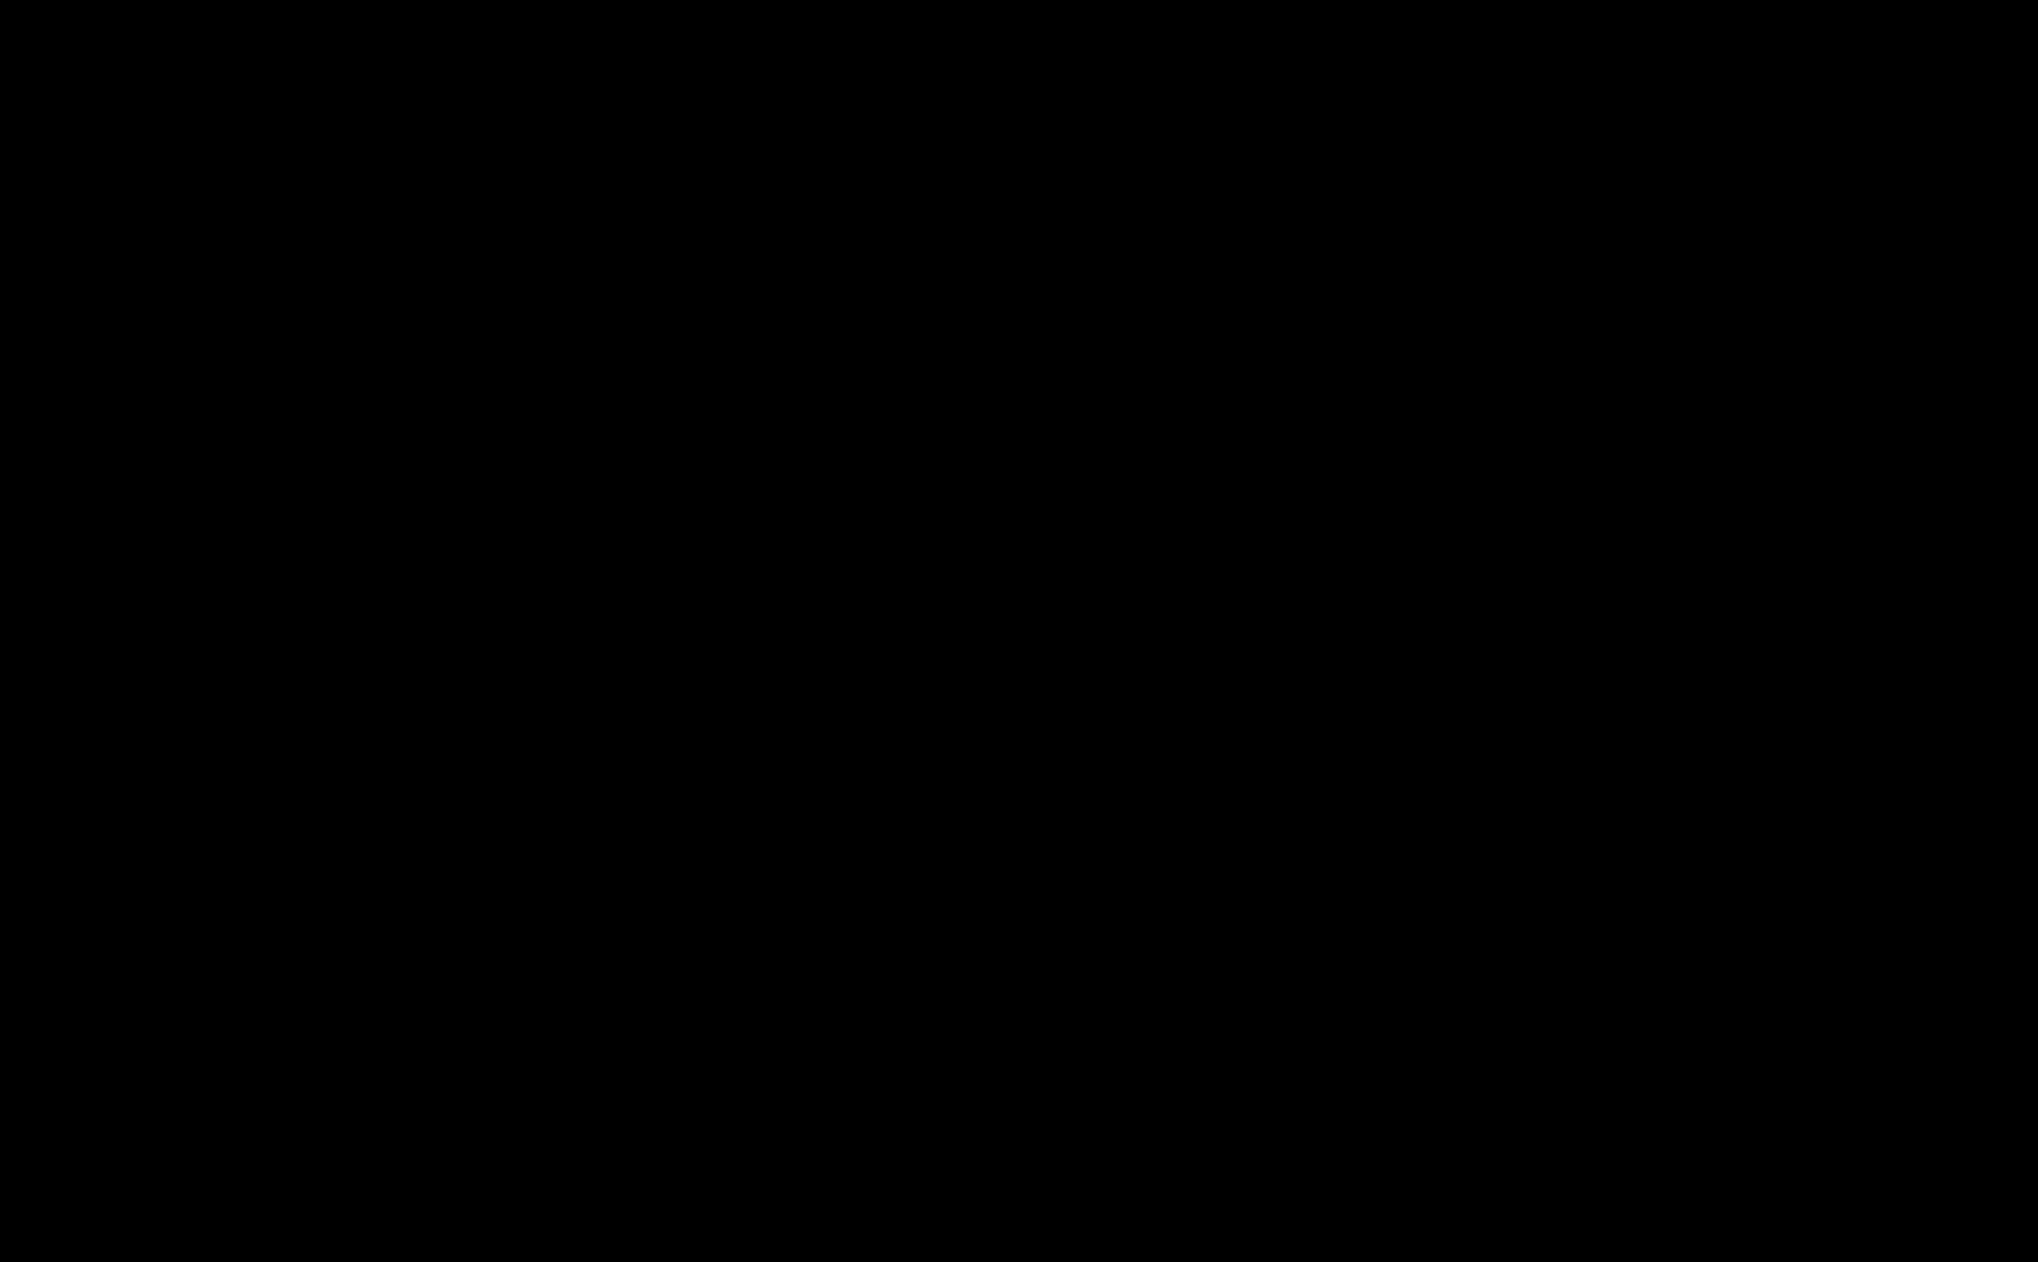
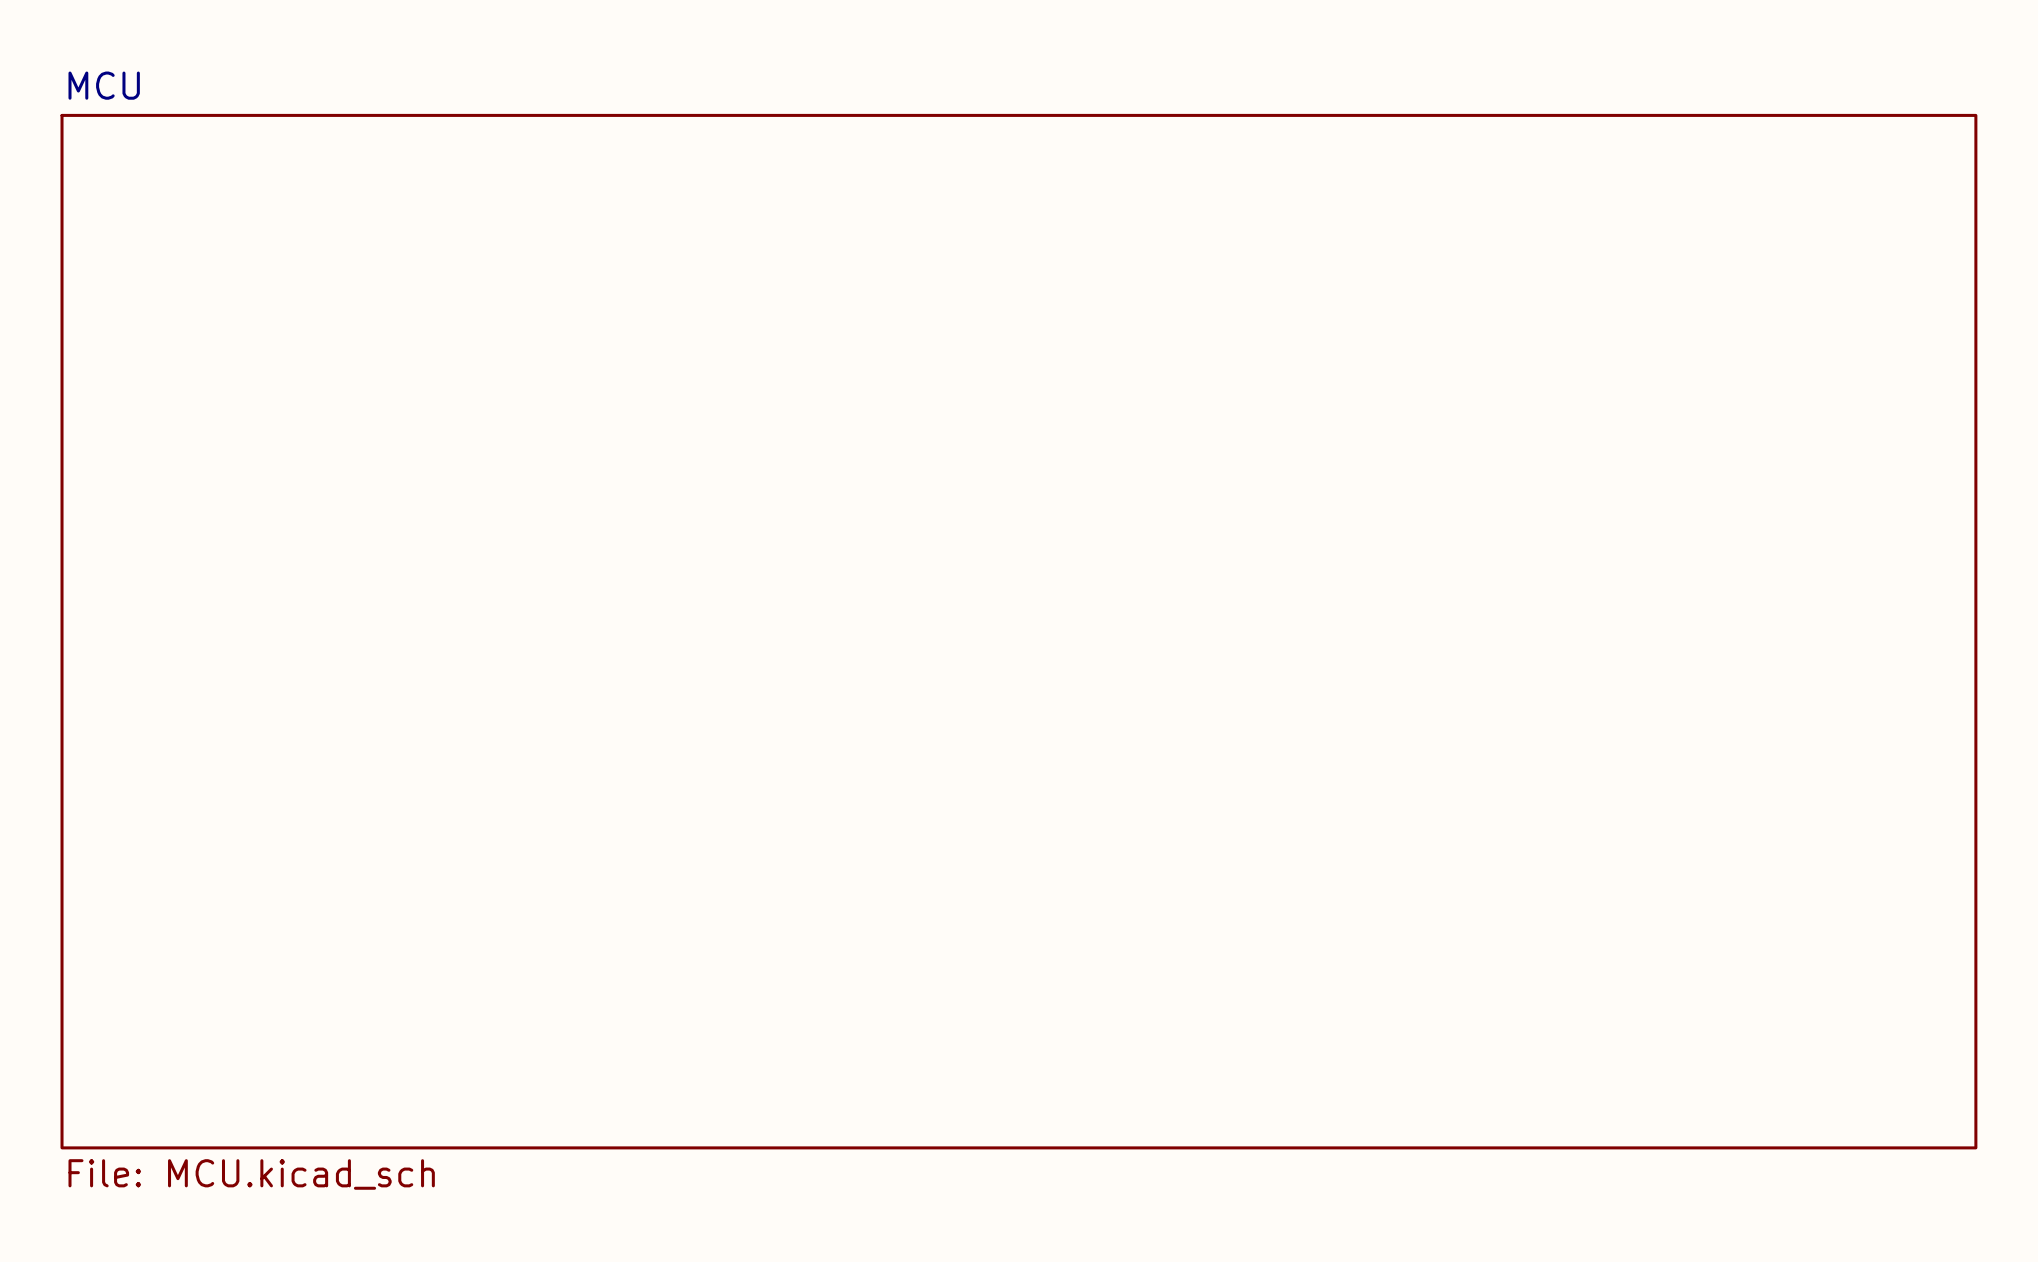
sheet MCU: none -> File: MCU.kicad_sch (1018, 631)

